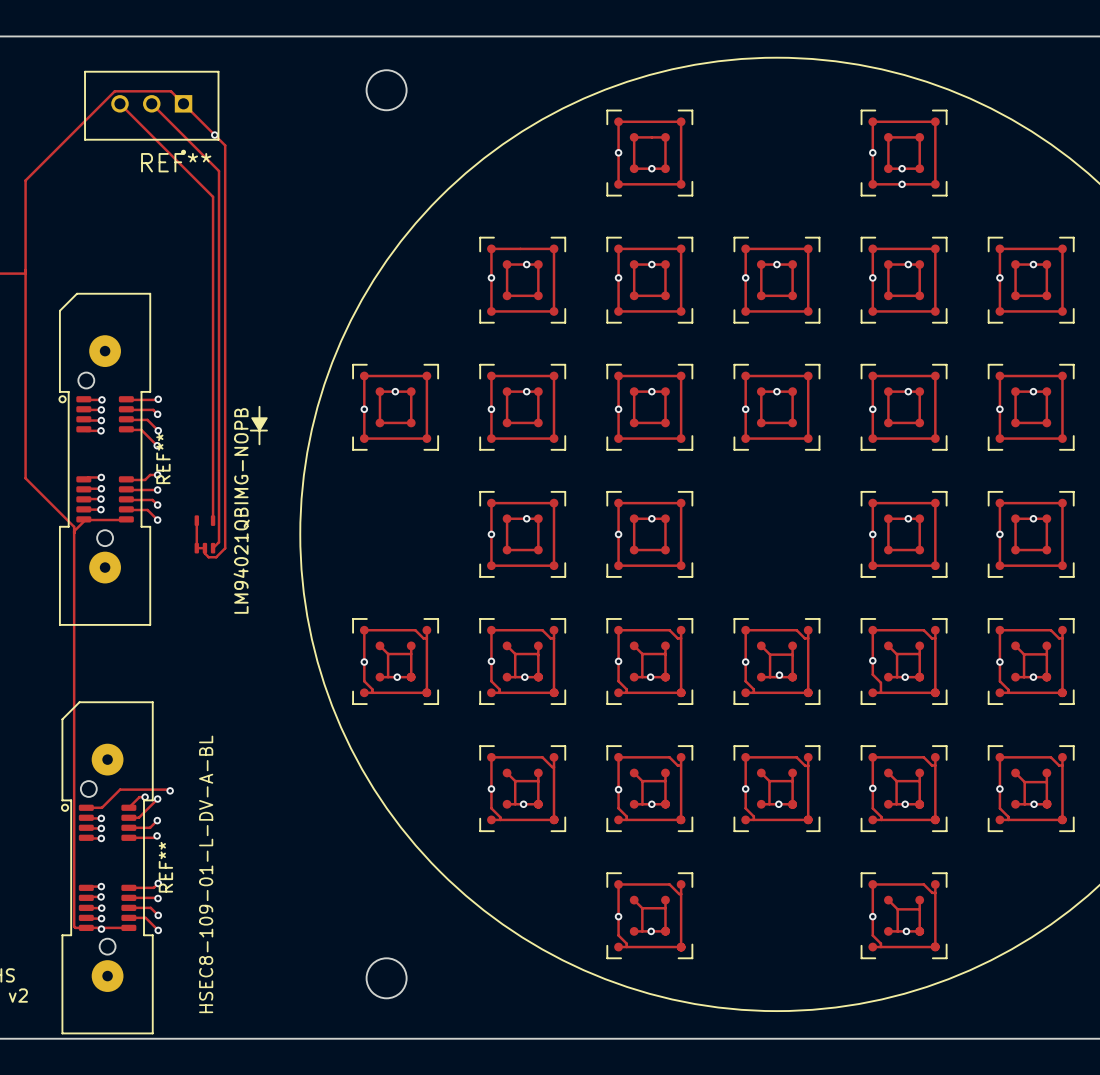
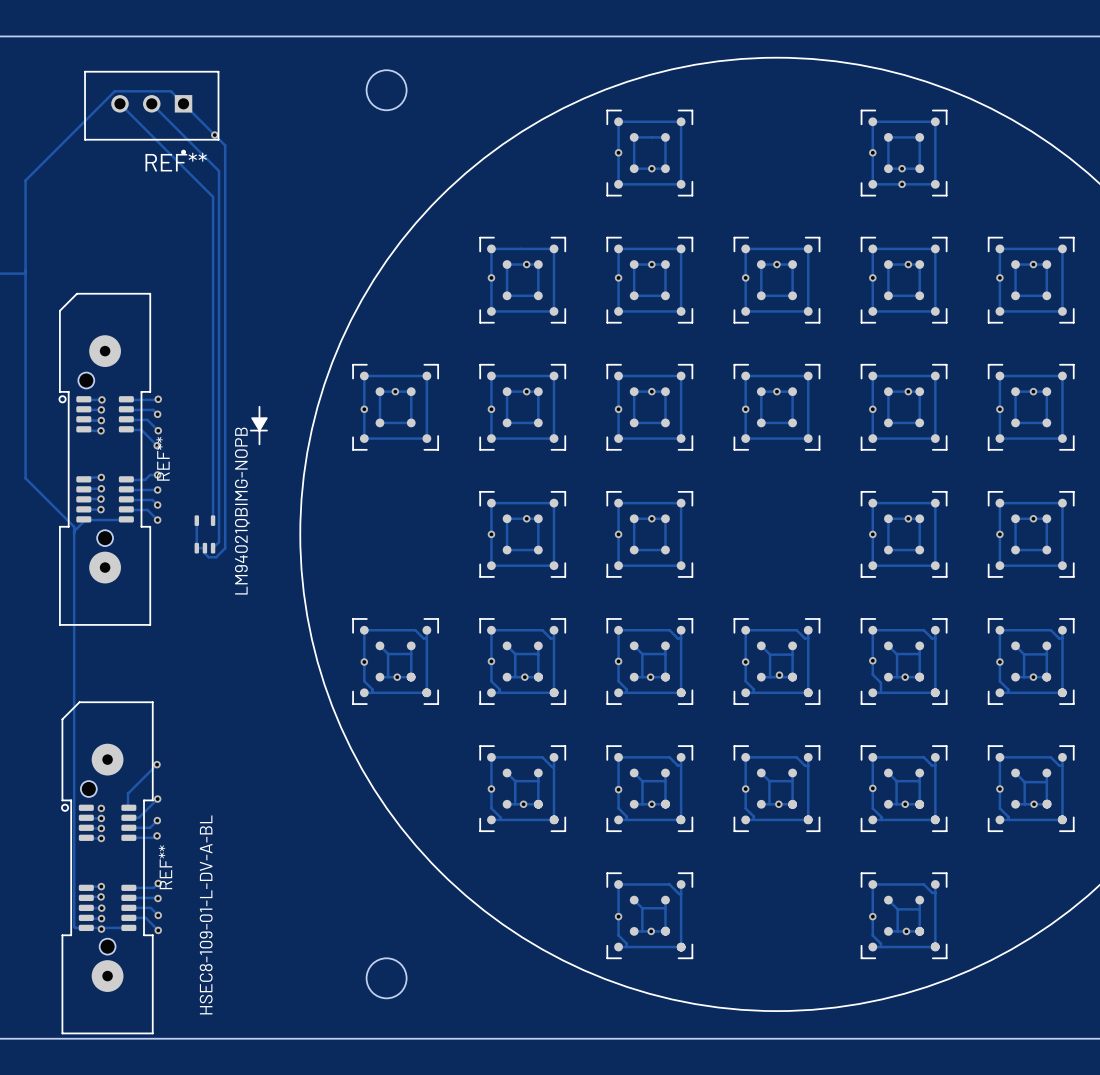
track: none -> (157, 764) (127, 793) (127, 807)
via: none -> (157, 764)
track: (170, 790) (120, 789) (101, 807) (86, 807) -> none
via: (170, 790) -> none
track: (145, 797) (139, 797) (128, 807) -> none
via: (145, 797) -> none
via: none -> (101, 808)

